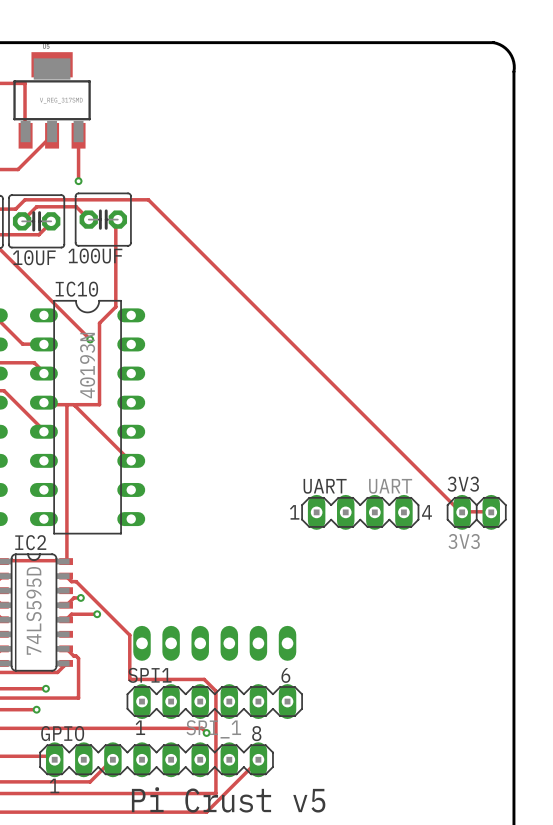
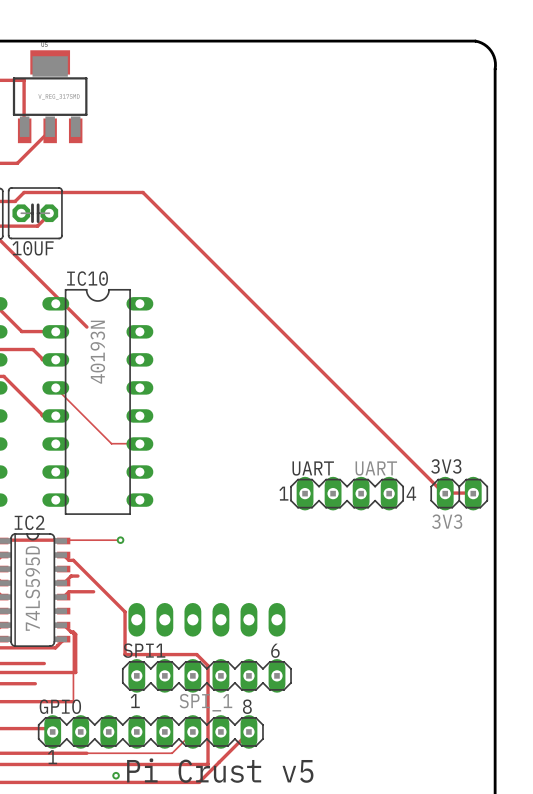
track: (78, 135) (78, 181) -> none
via: (78, 181) -> none
track: (88, 219) (76, 206) (36, 206) (22, 221) -> none
100UF: (103, 219) -> none
track: (117, 219) (115, 220) (115, 306) (99, 323) (99, 404) (75, 405) -> none
via: (90, 339) -> none
track: (43, 402) (45, 404) (73, 404) (131, 460) -> none
track: none -> (55, 387) (111, 443) (139, 443)
track: (66, 404) (66, 560) -> (120, 540) (64, 540)
IC10 position: (87, 417) -> (97, 401)
via: none -> (120, 540)
via: (80, 597) -> none
via: (97, 614) -> none
via: (45, 688) -> none
via: (36, 709) -> none
track: (76, 728) (201, 728) (206, 732) -> (73, 701) (73, 634) (71, 632)
via: (206, 732) -> none
track: (112, 759) (90, 781) -> (192, 731) (172, 753) (86, 753)
via: none -> (116, 775)

